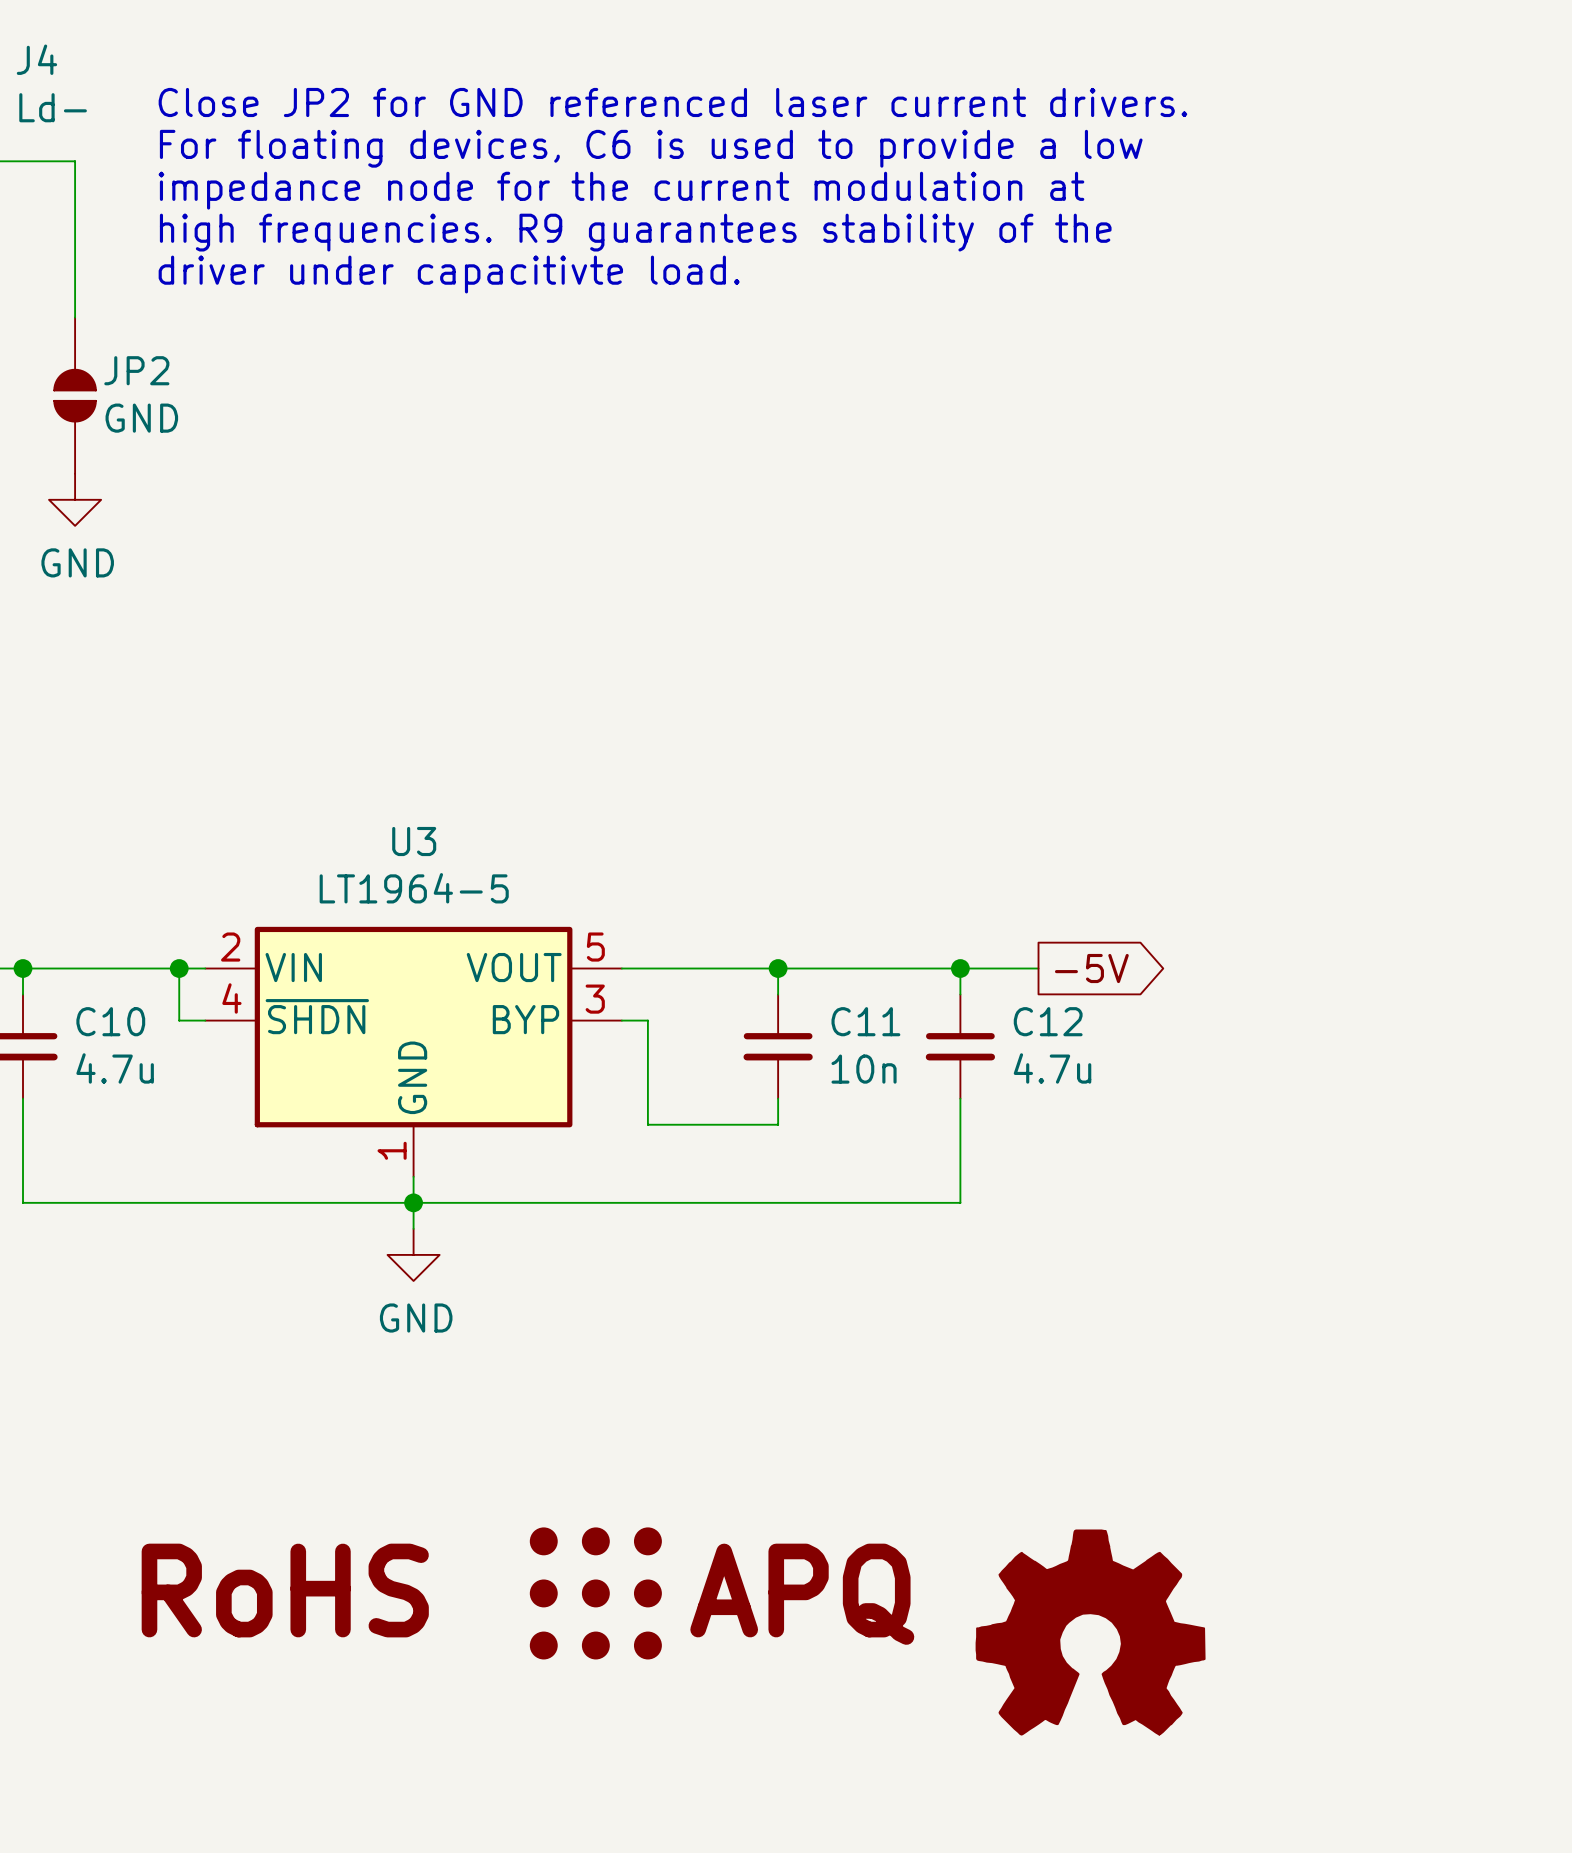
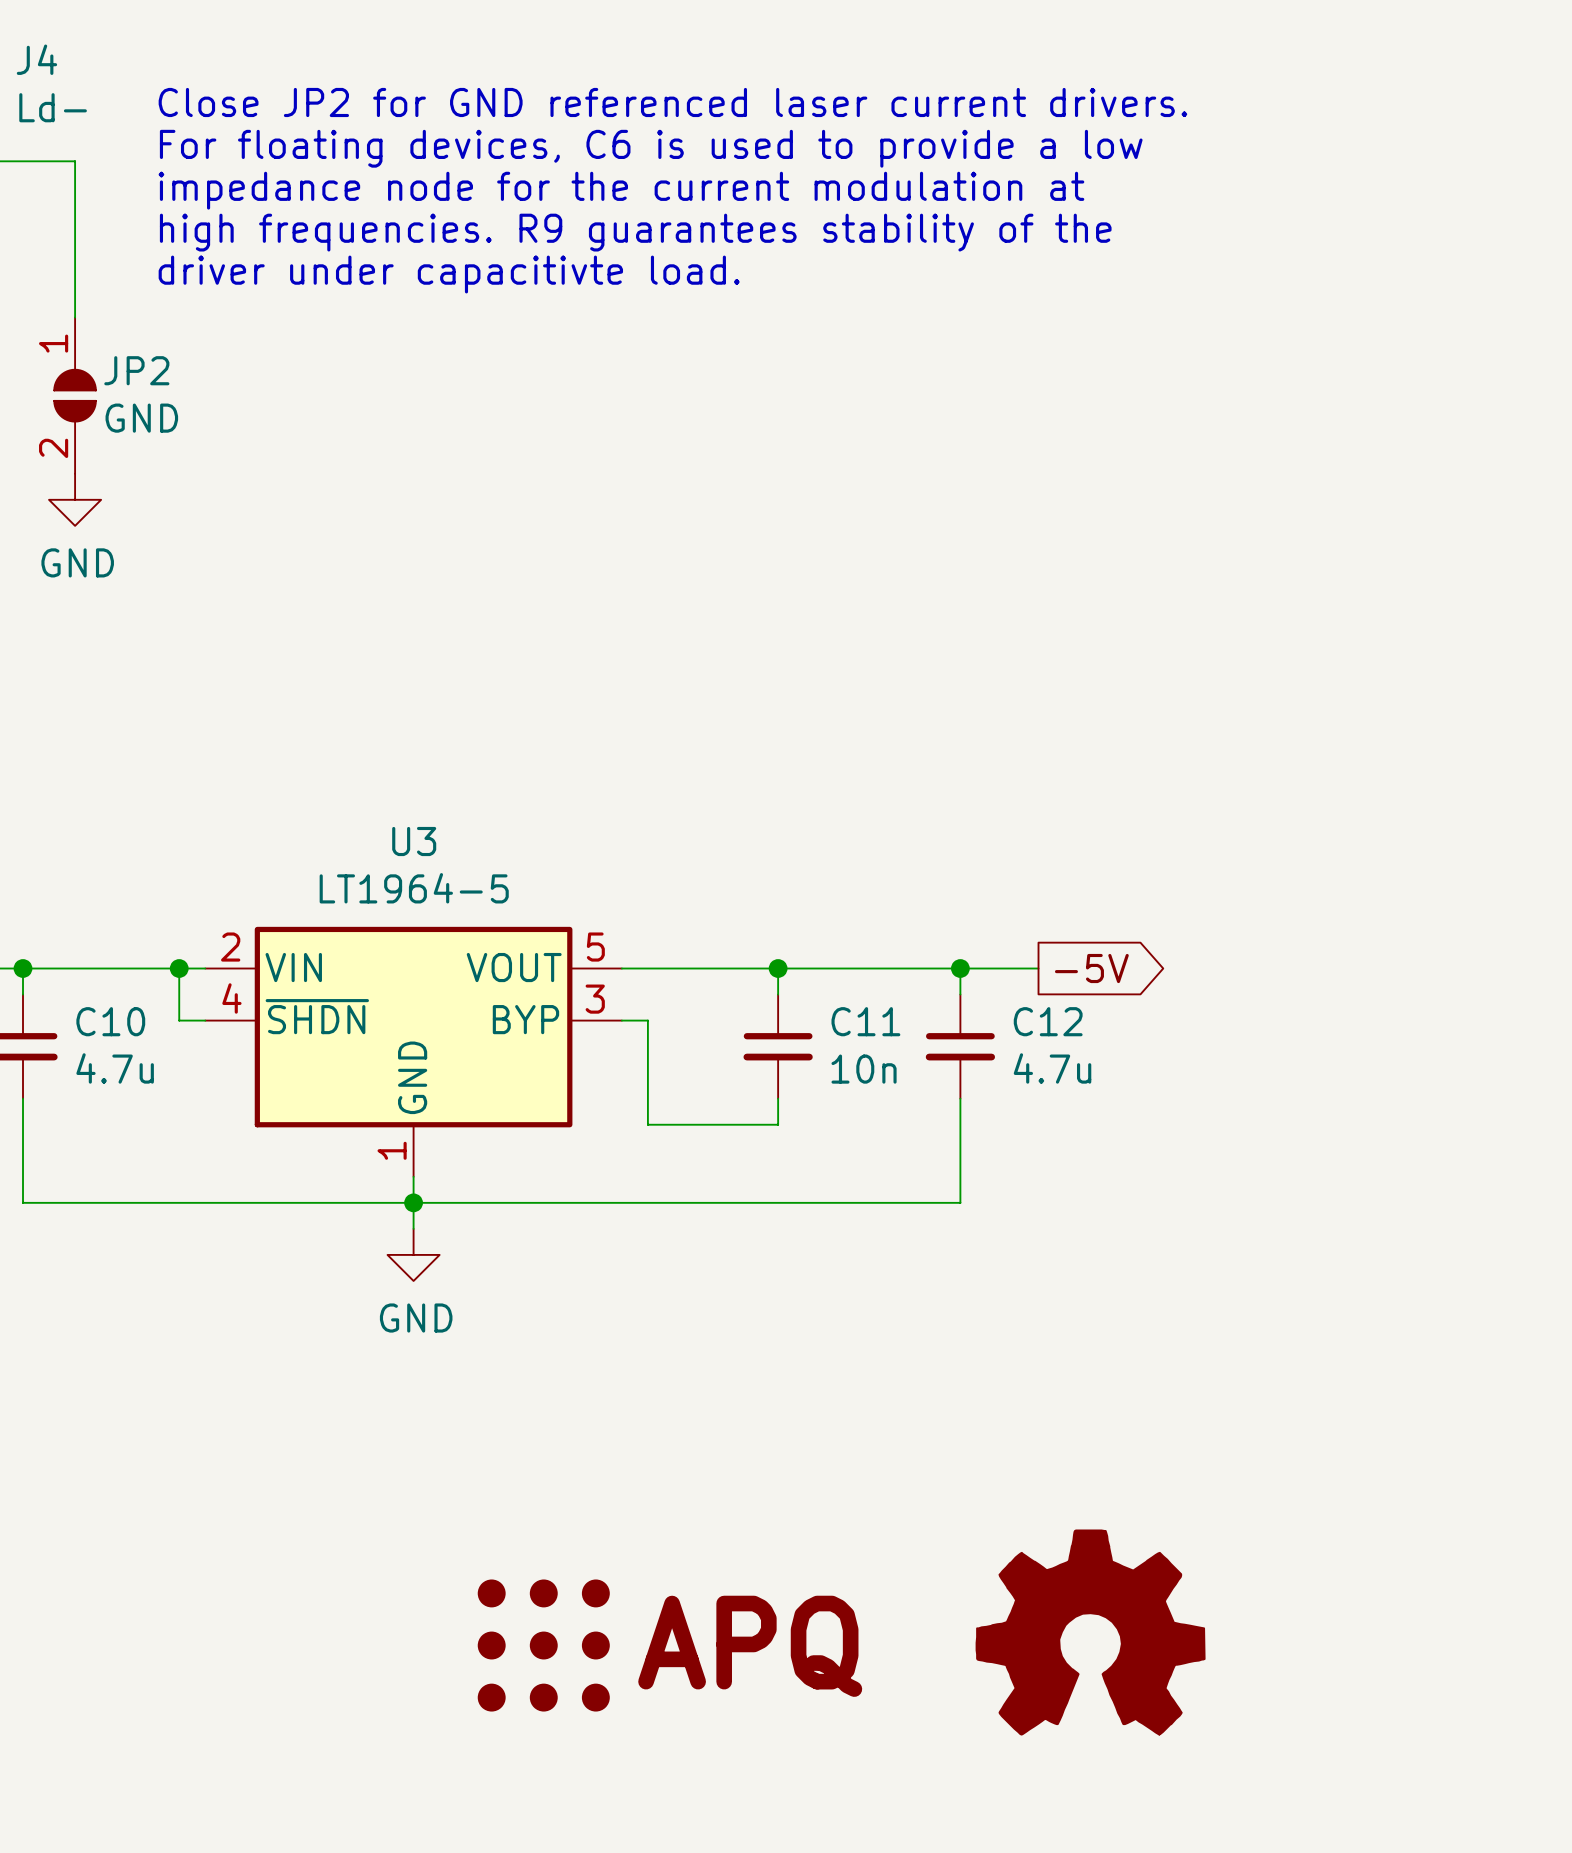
JP2 pin number: none -> 1 (53, 343)
JP2 pin number: none -> 2 (53, 448)
part: (285, 1590) -> none
part position: (595, 1593) -> (543, 1645)

